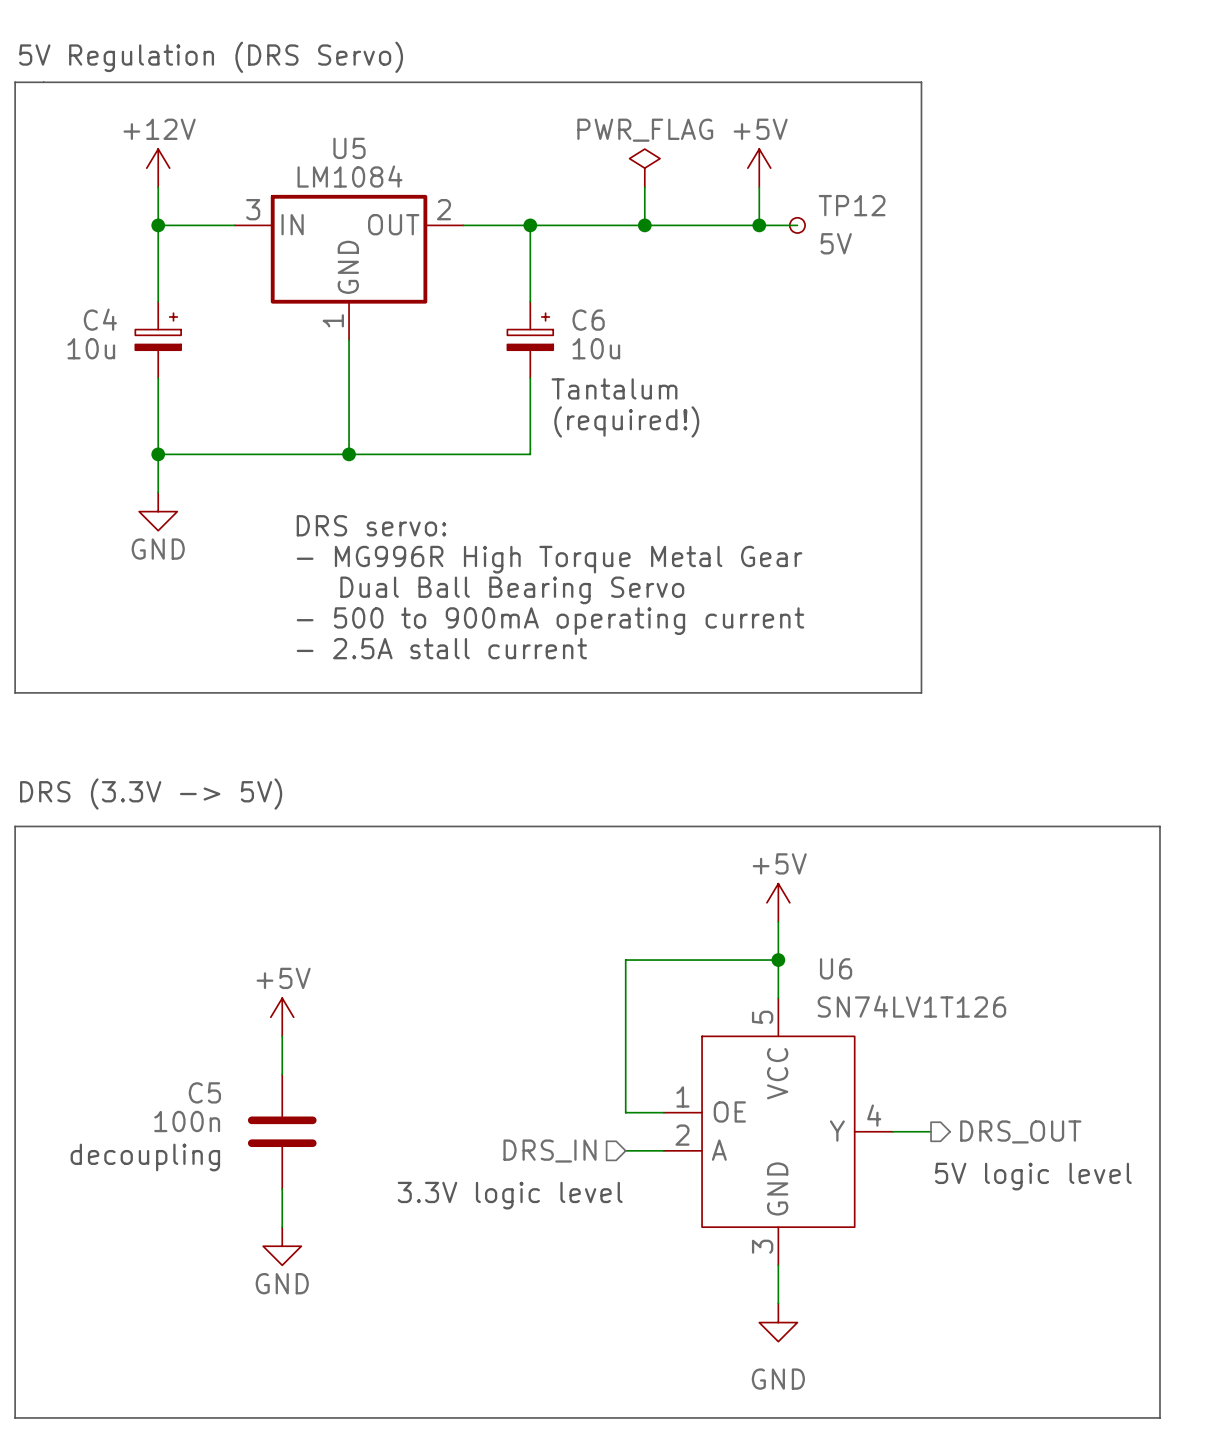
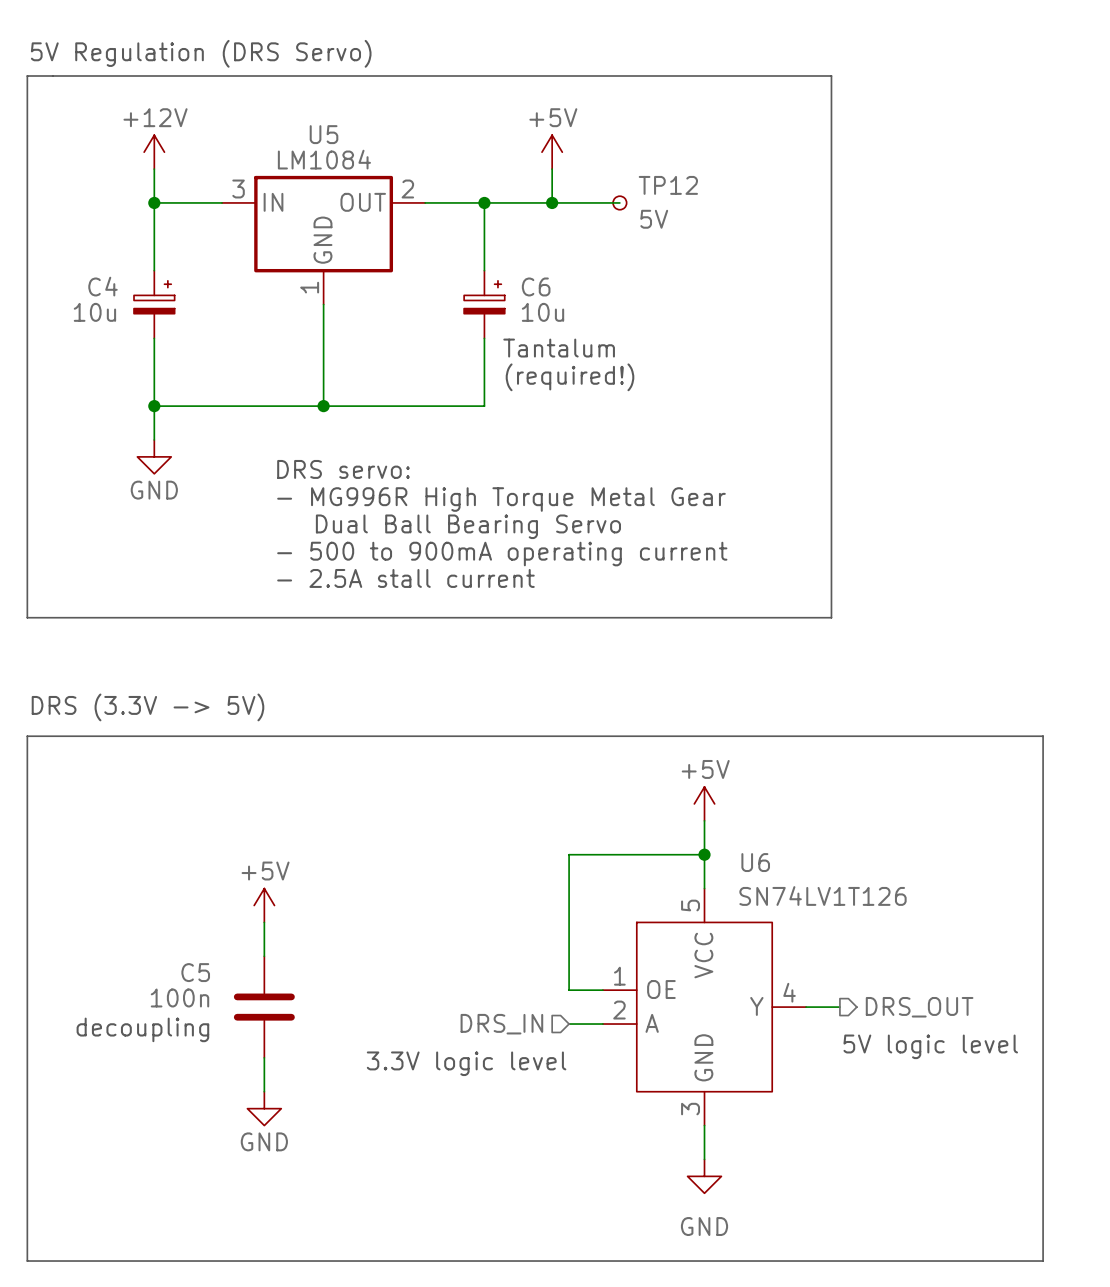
power symbol: PWR_FLAG (644, 168) -> none
power symbol position: +5V (759, 168) -> +5V (552, 152)
wire: (644, 187) (644, 225) -> (552, 169) (552, 202)
wire: (759, 187) (759, 225) -> none
junction position: (644, 225) -> (552, 202)
wire: (682, 225) (797, 225) -> none
junction: (759, 225) -> none
TP12 position: (797, 225) -> (619, 202)

